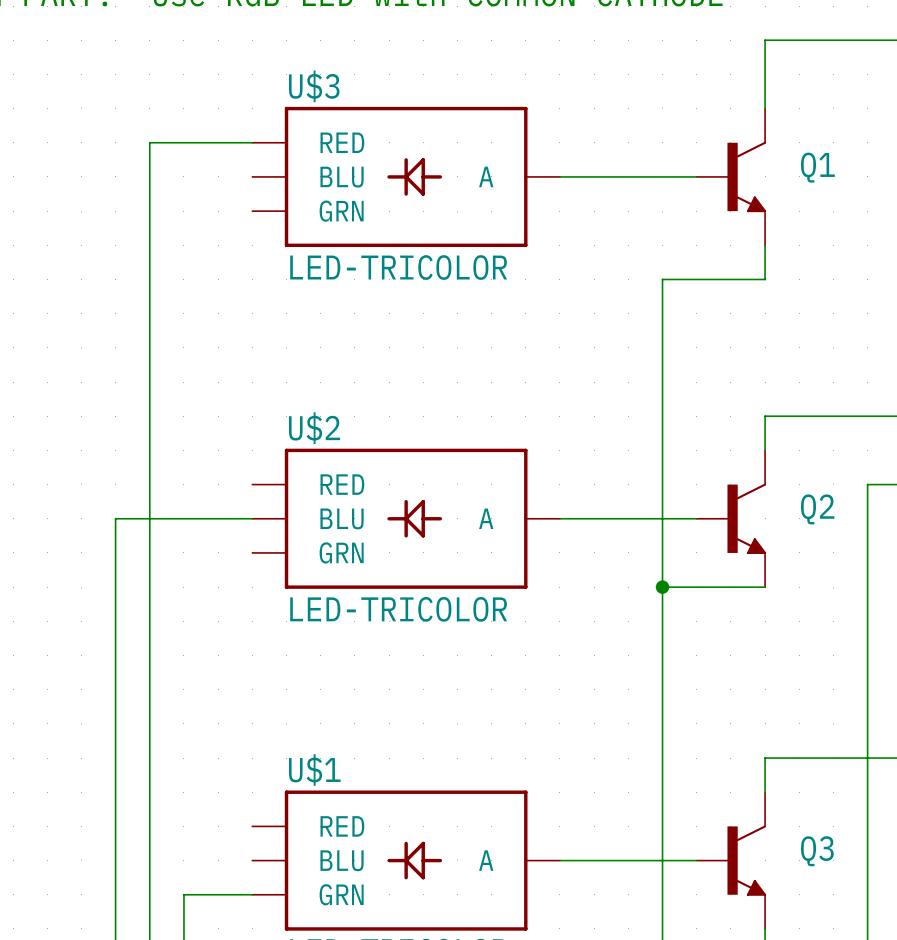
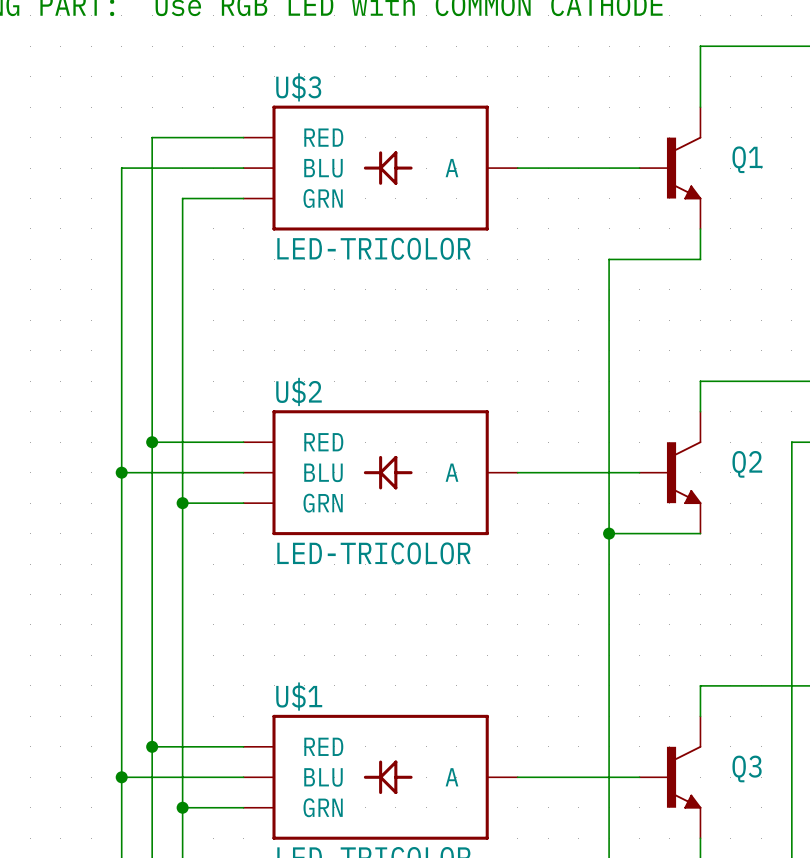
wire: none -> (243, 168) (121, 168) (121, 472)
wire: none -> (243, 198) (182, 198) (182, 807)
wire: none -> (152, 442) (243, 442)
junction: none -> (152, 442)
junction: none -> (121, 472)
wire: none -> (182, 503) (243, 503)
junction: none -> (182, 503)
wire: none -> (152, 746) (243, 746)
junction: none -> (152, 746)
wire: none -> (121, 777) (243, 777)
junction: none -> (121, 777)
junction: none -> (182, 807)

